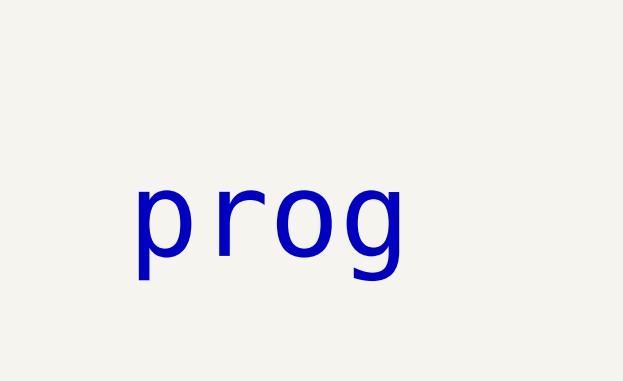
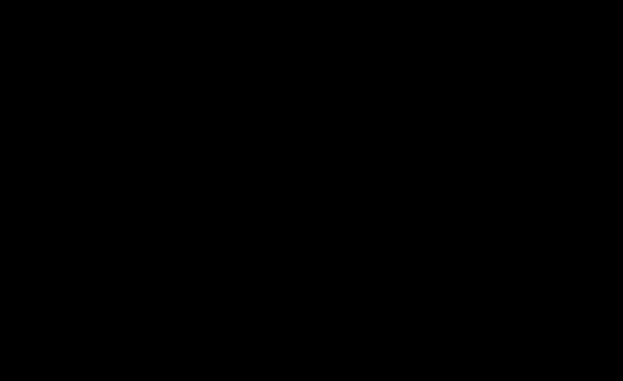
text: prog (269, 235) -> none

